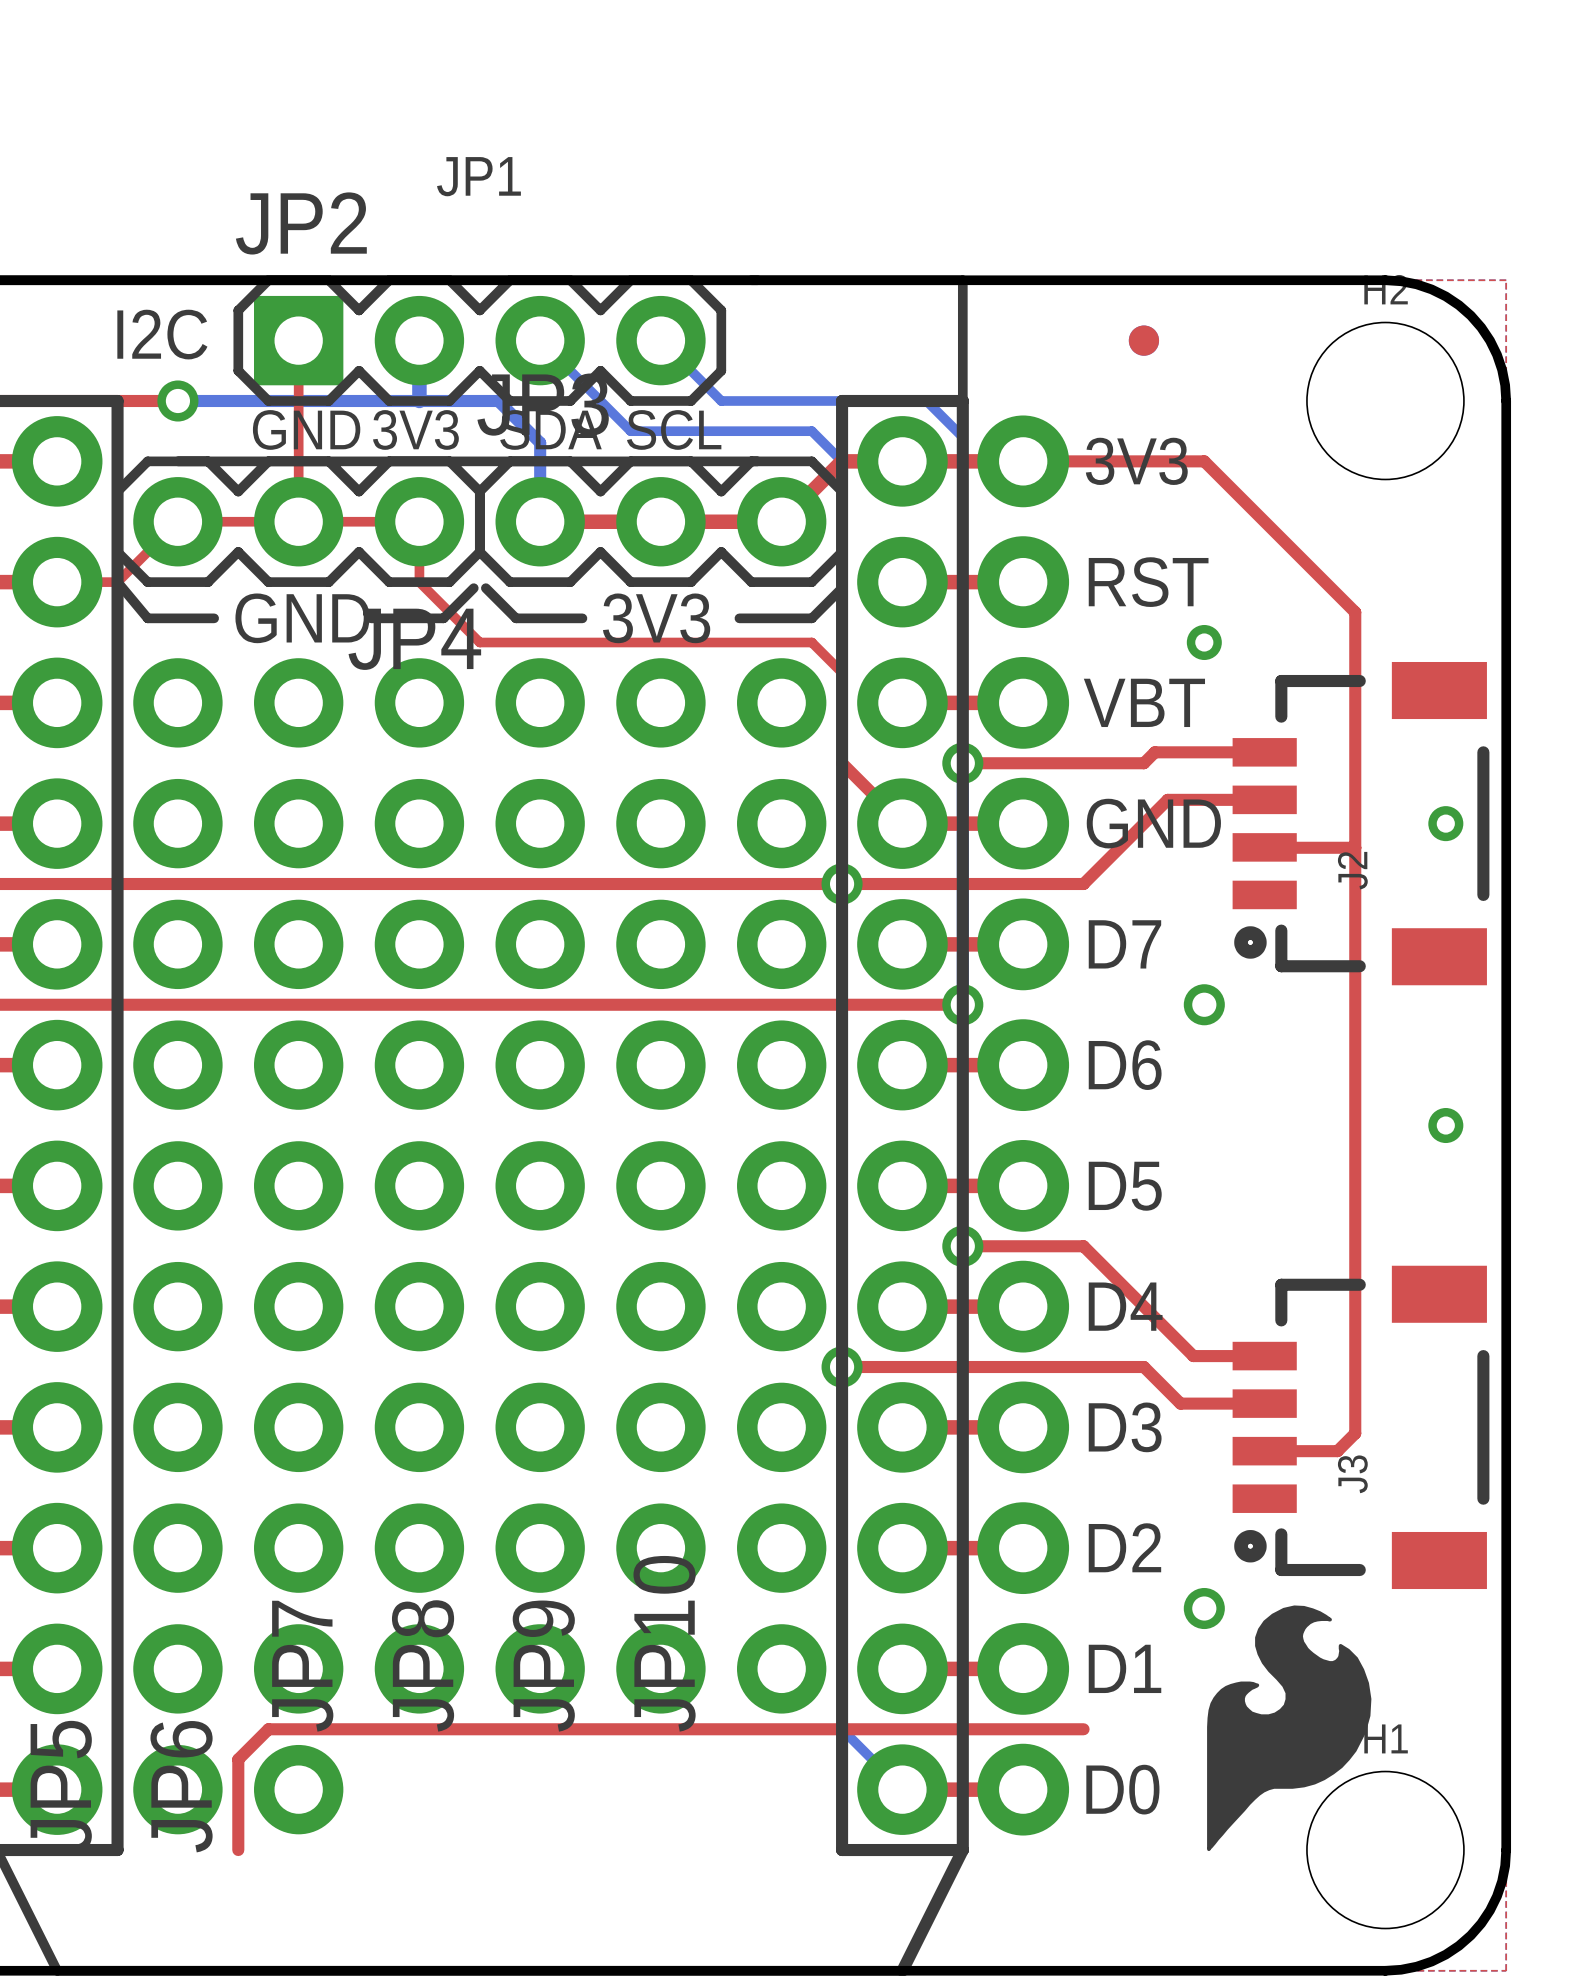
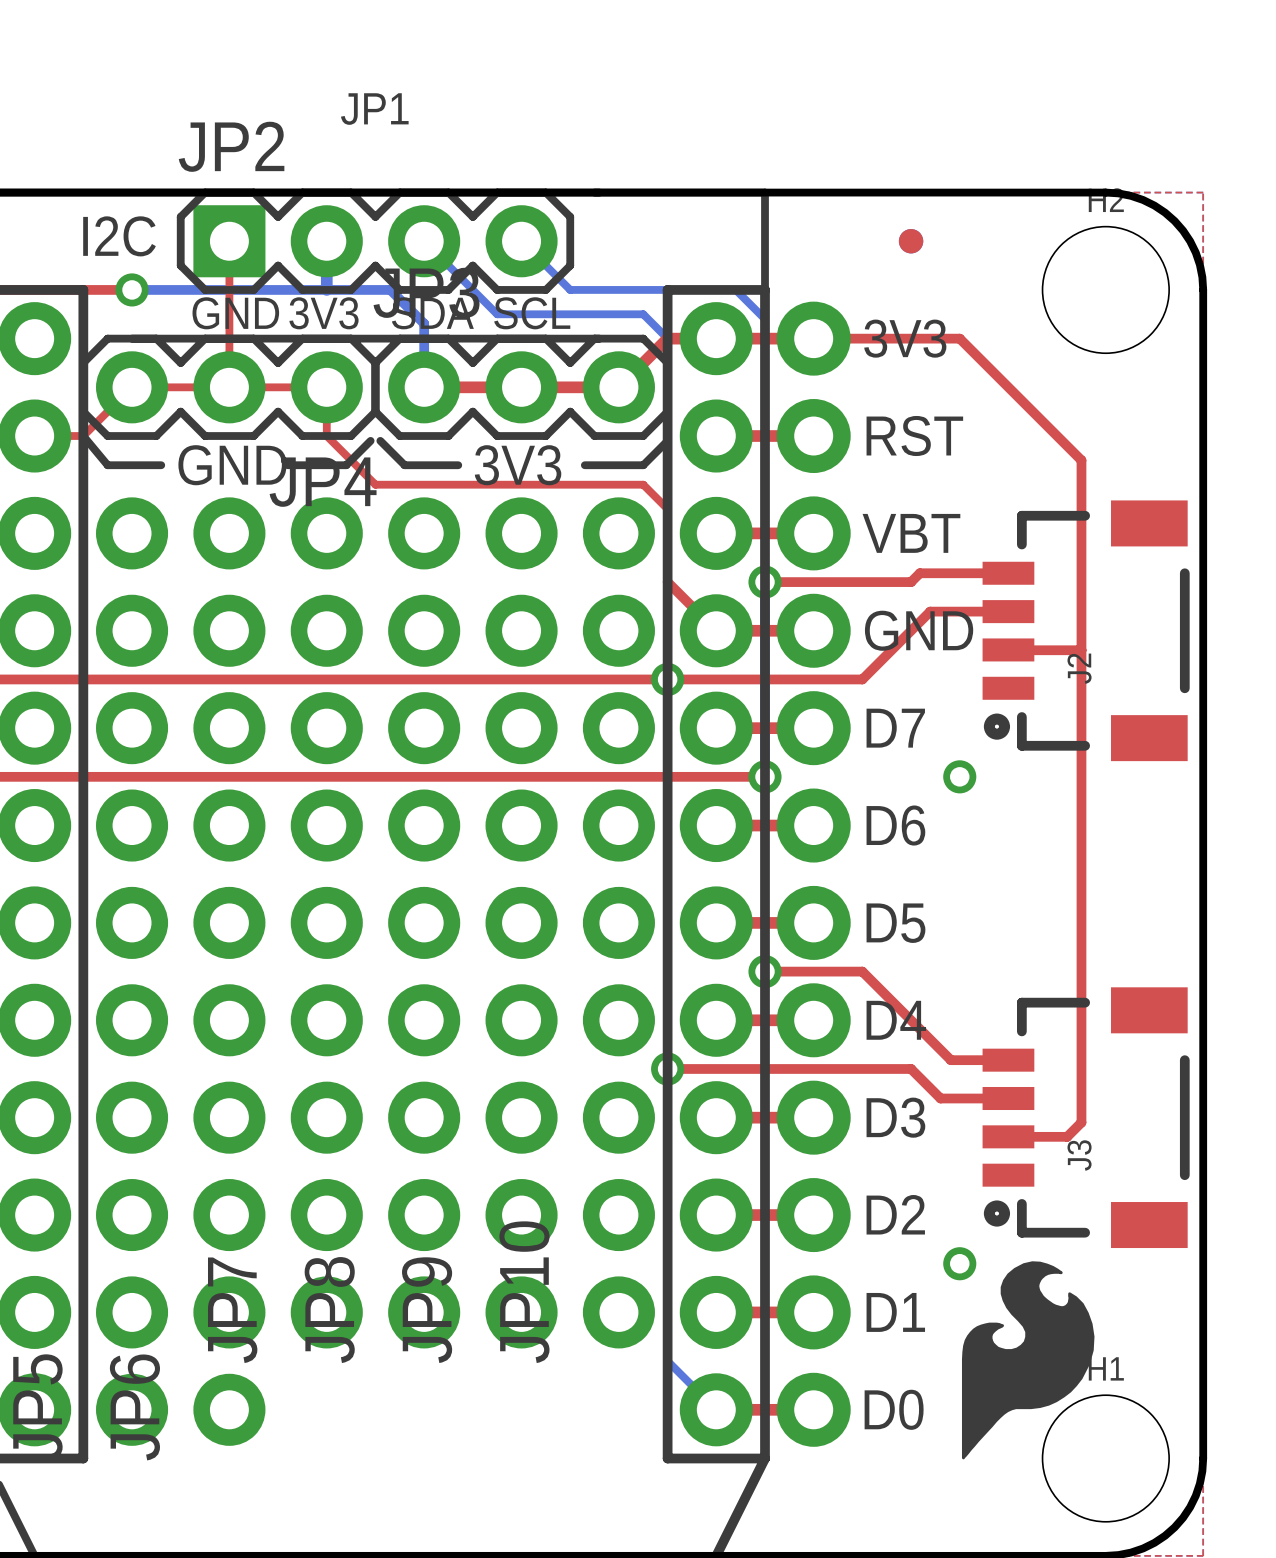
via: (1204, 642) -> none
via: (1445, 823) -> none
via: (1445, 1125) -> none
top track: (1083, 1729) (268, 1729) (238, 1759) (238, 1850) -> none

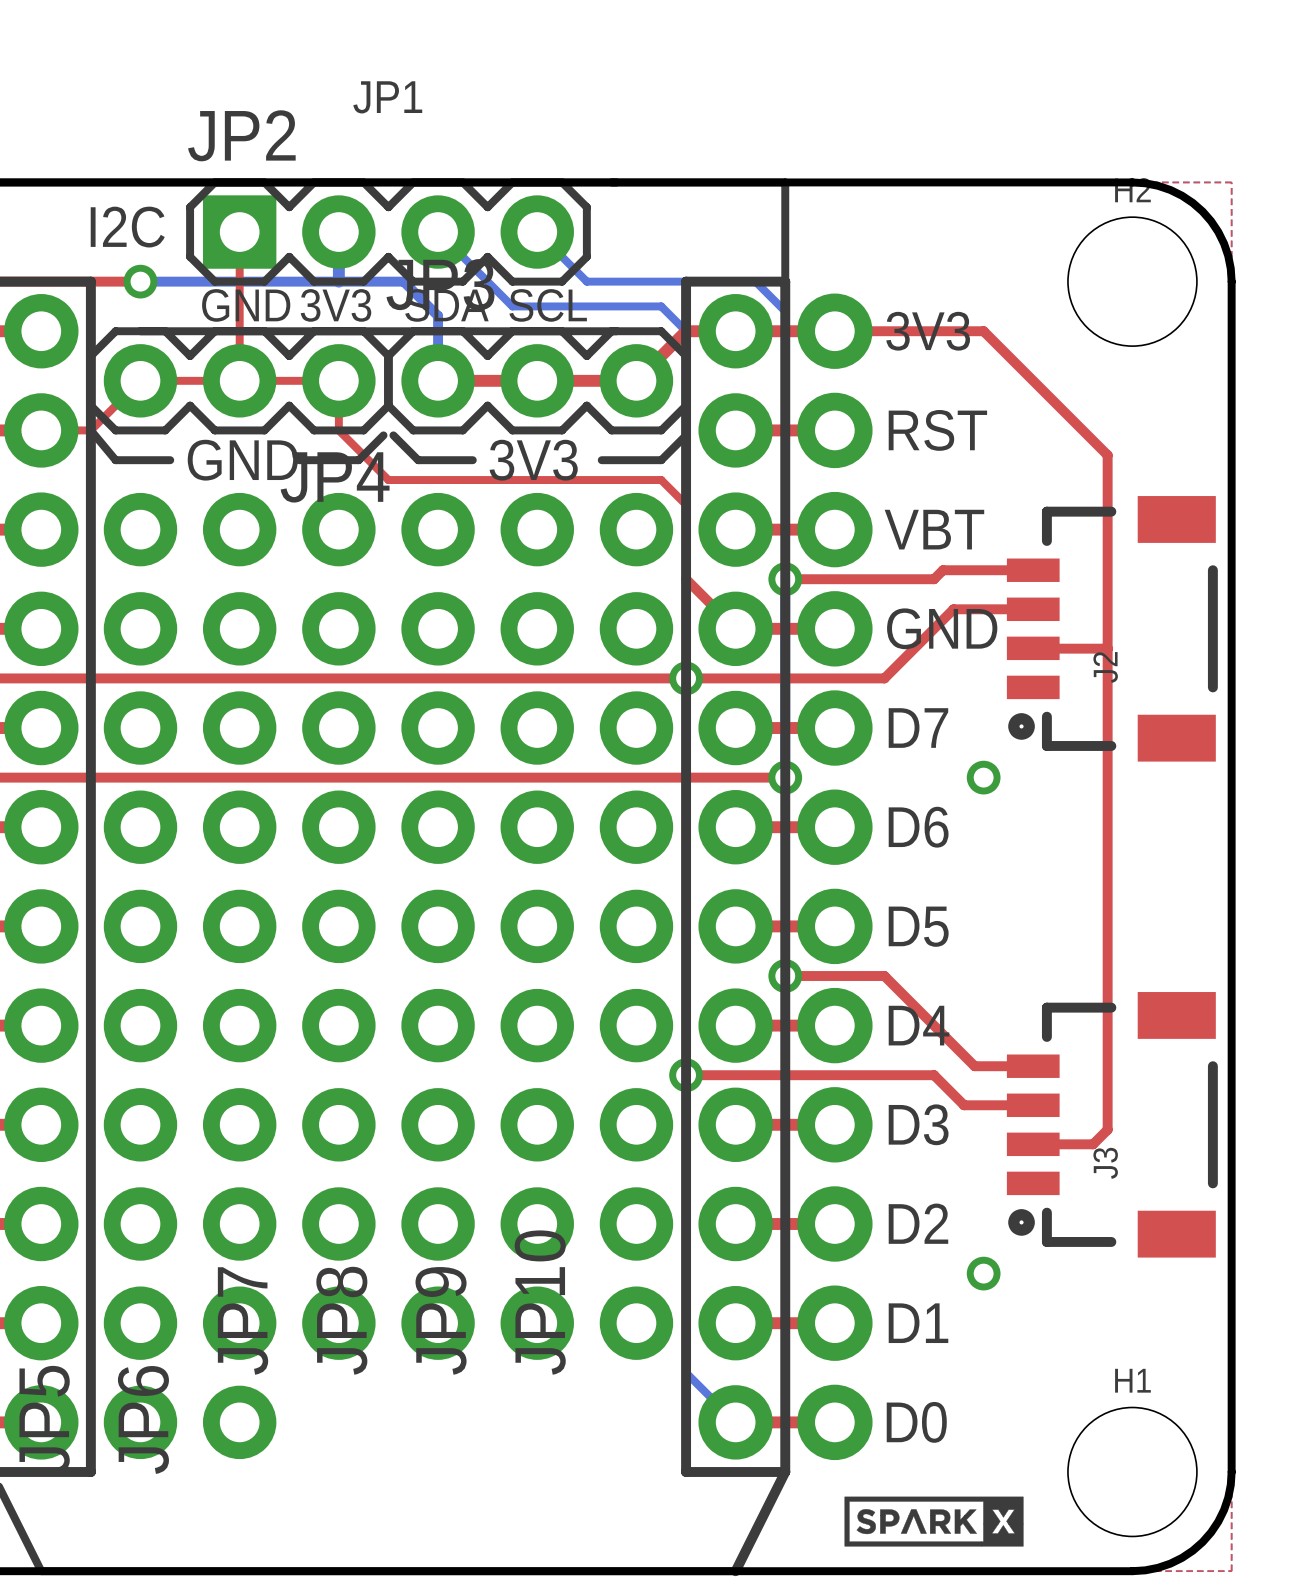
part: (911, 241) -> none
drawing: [961, 1261, 1095, 1460] -> none
drawing: none -> [844, 1496, 1024, 1547]

